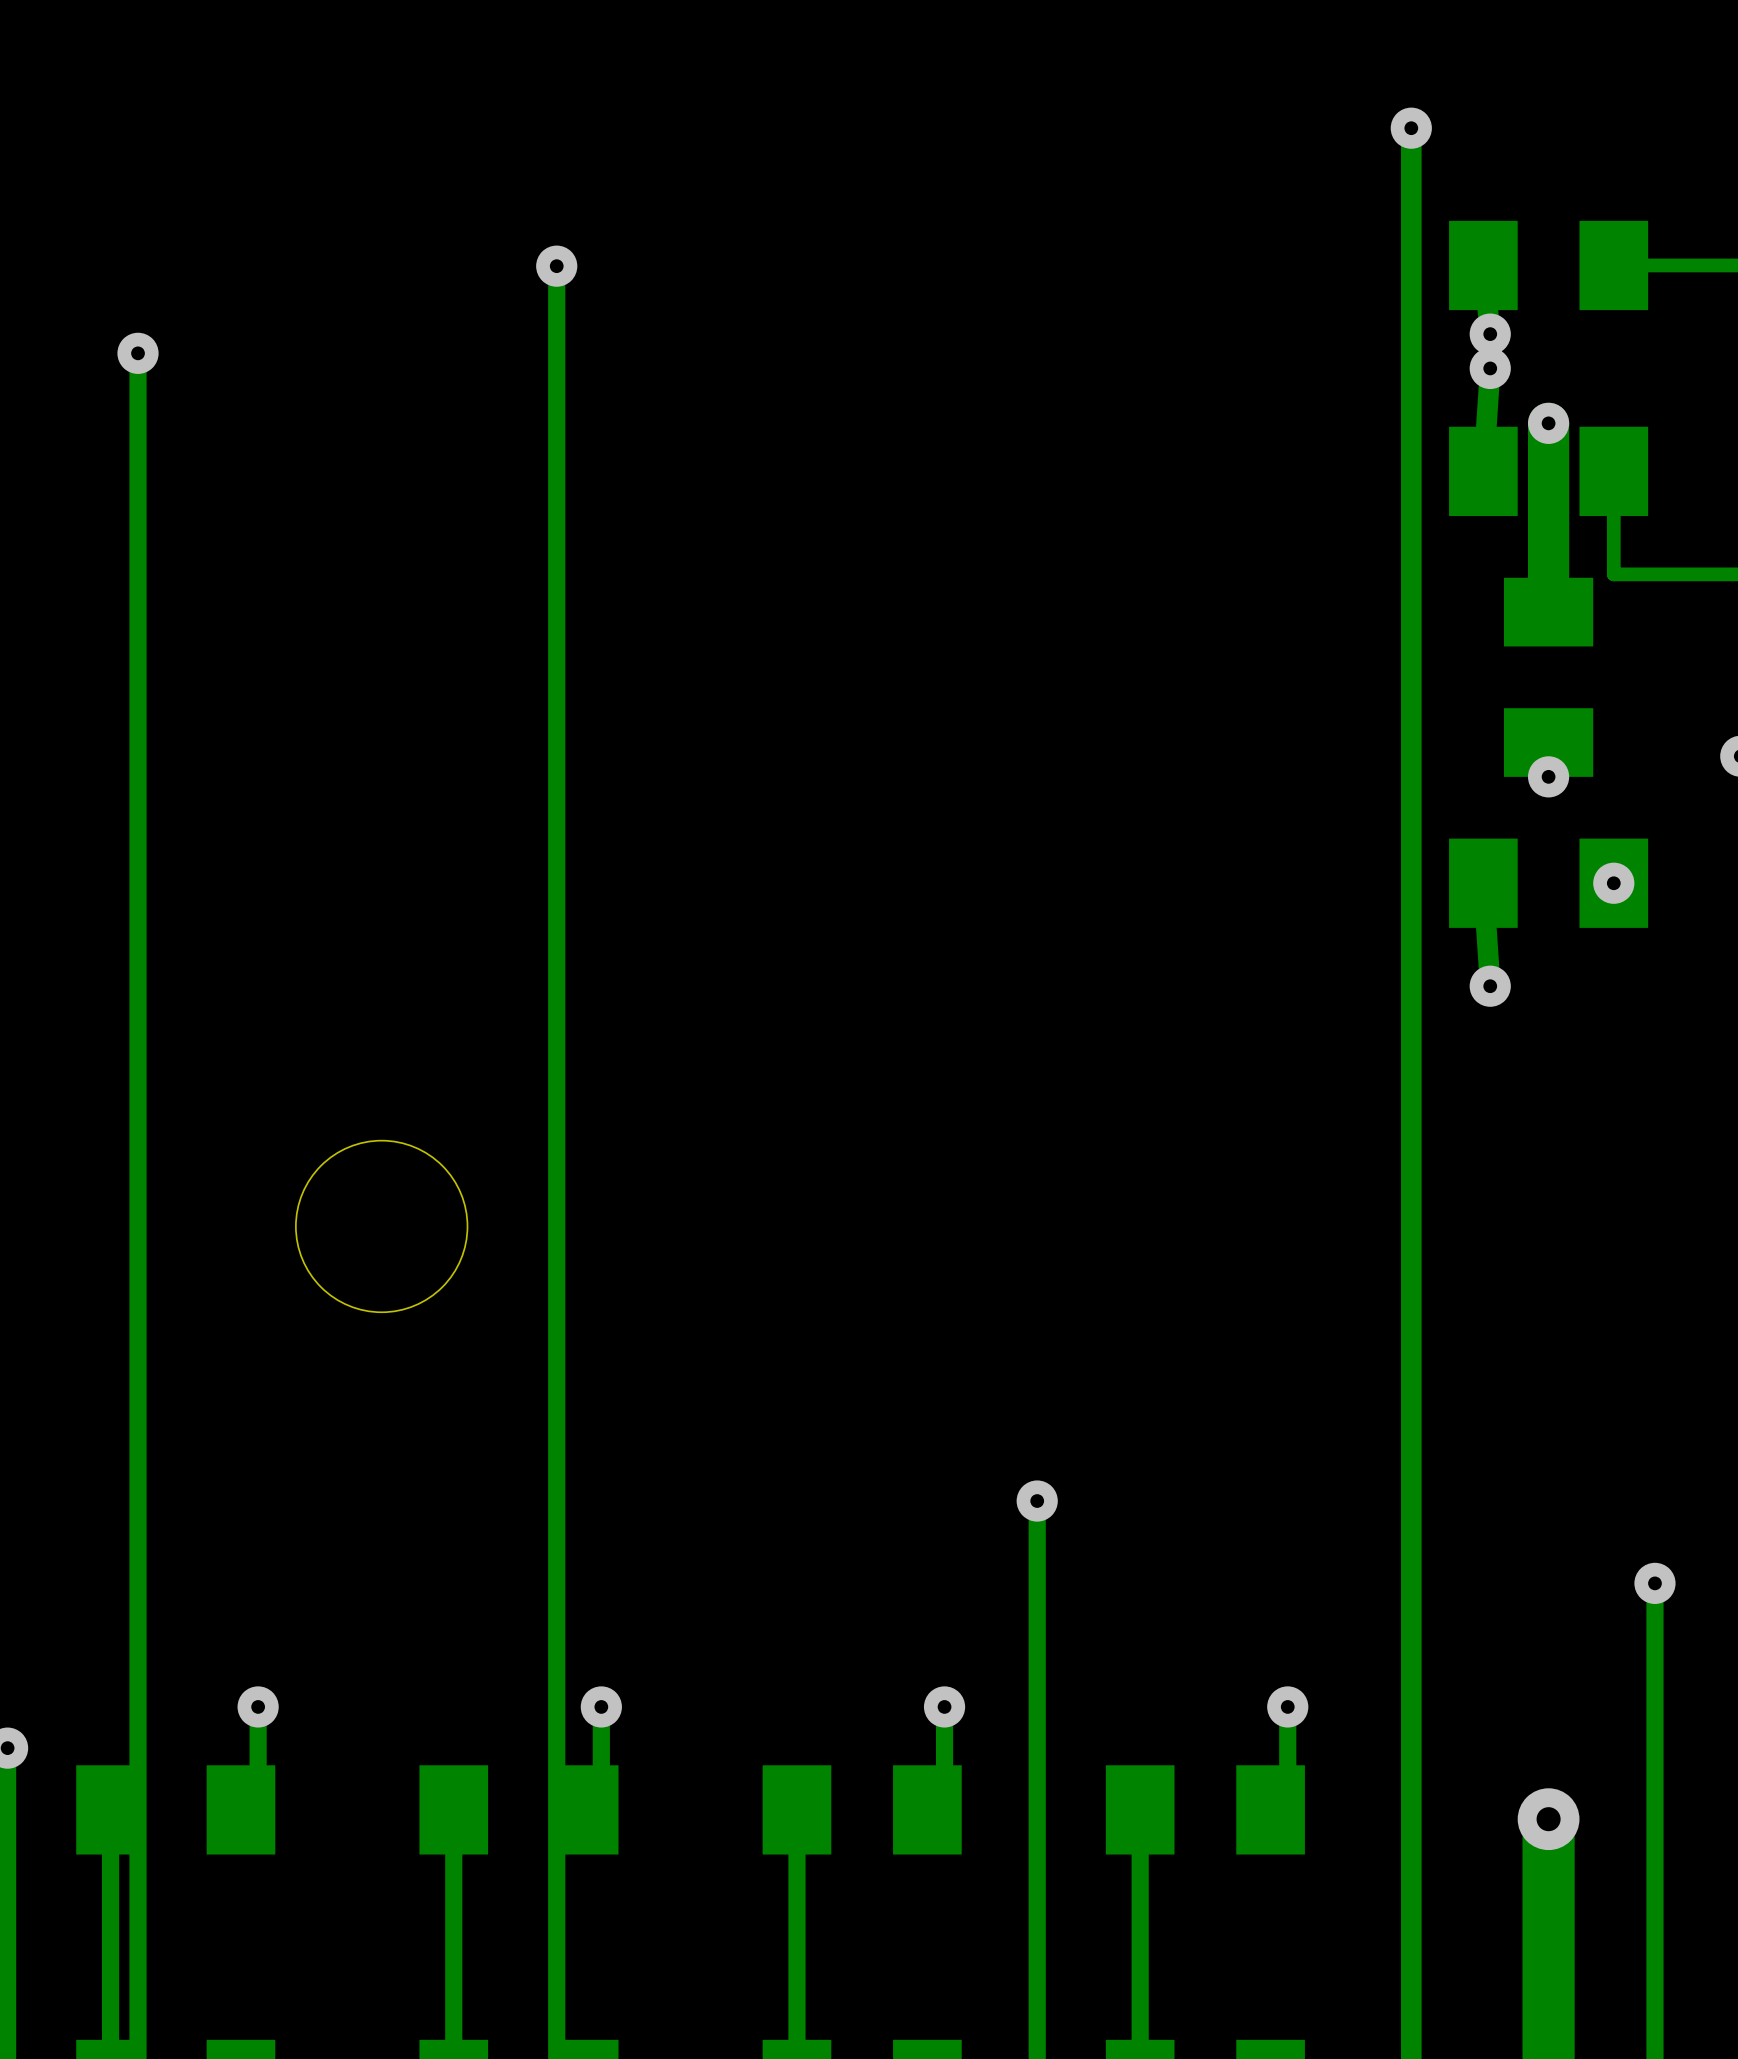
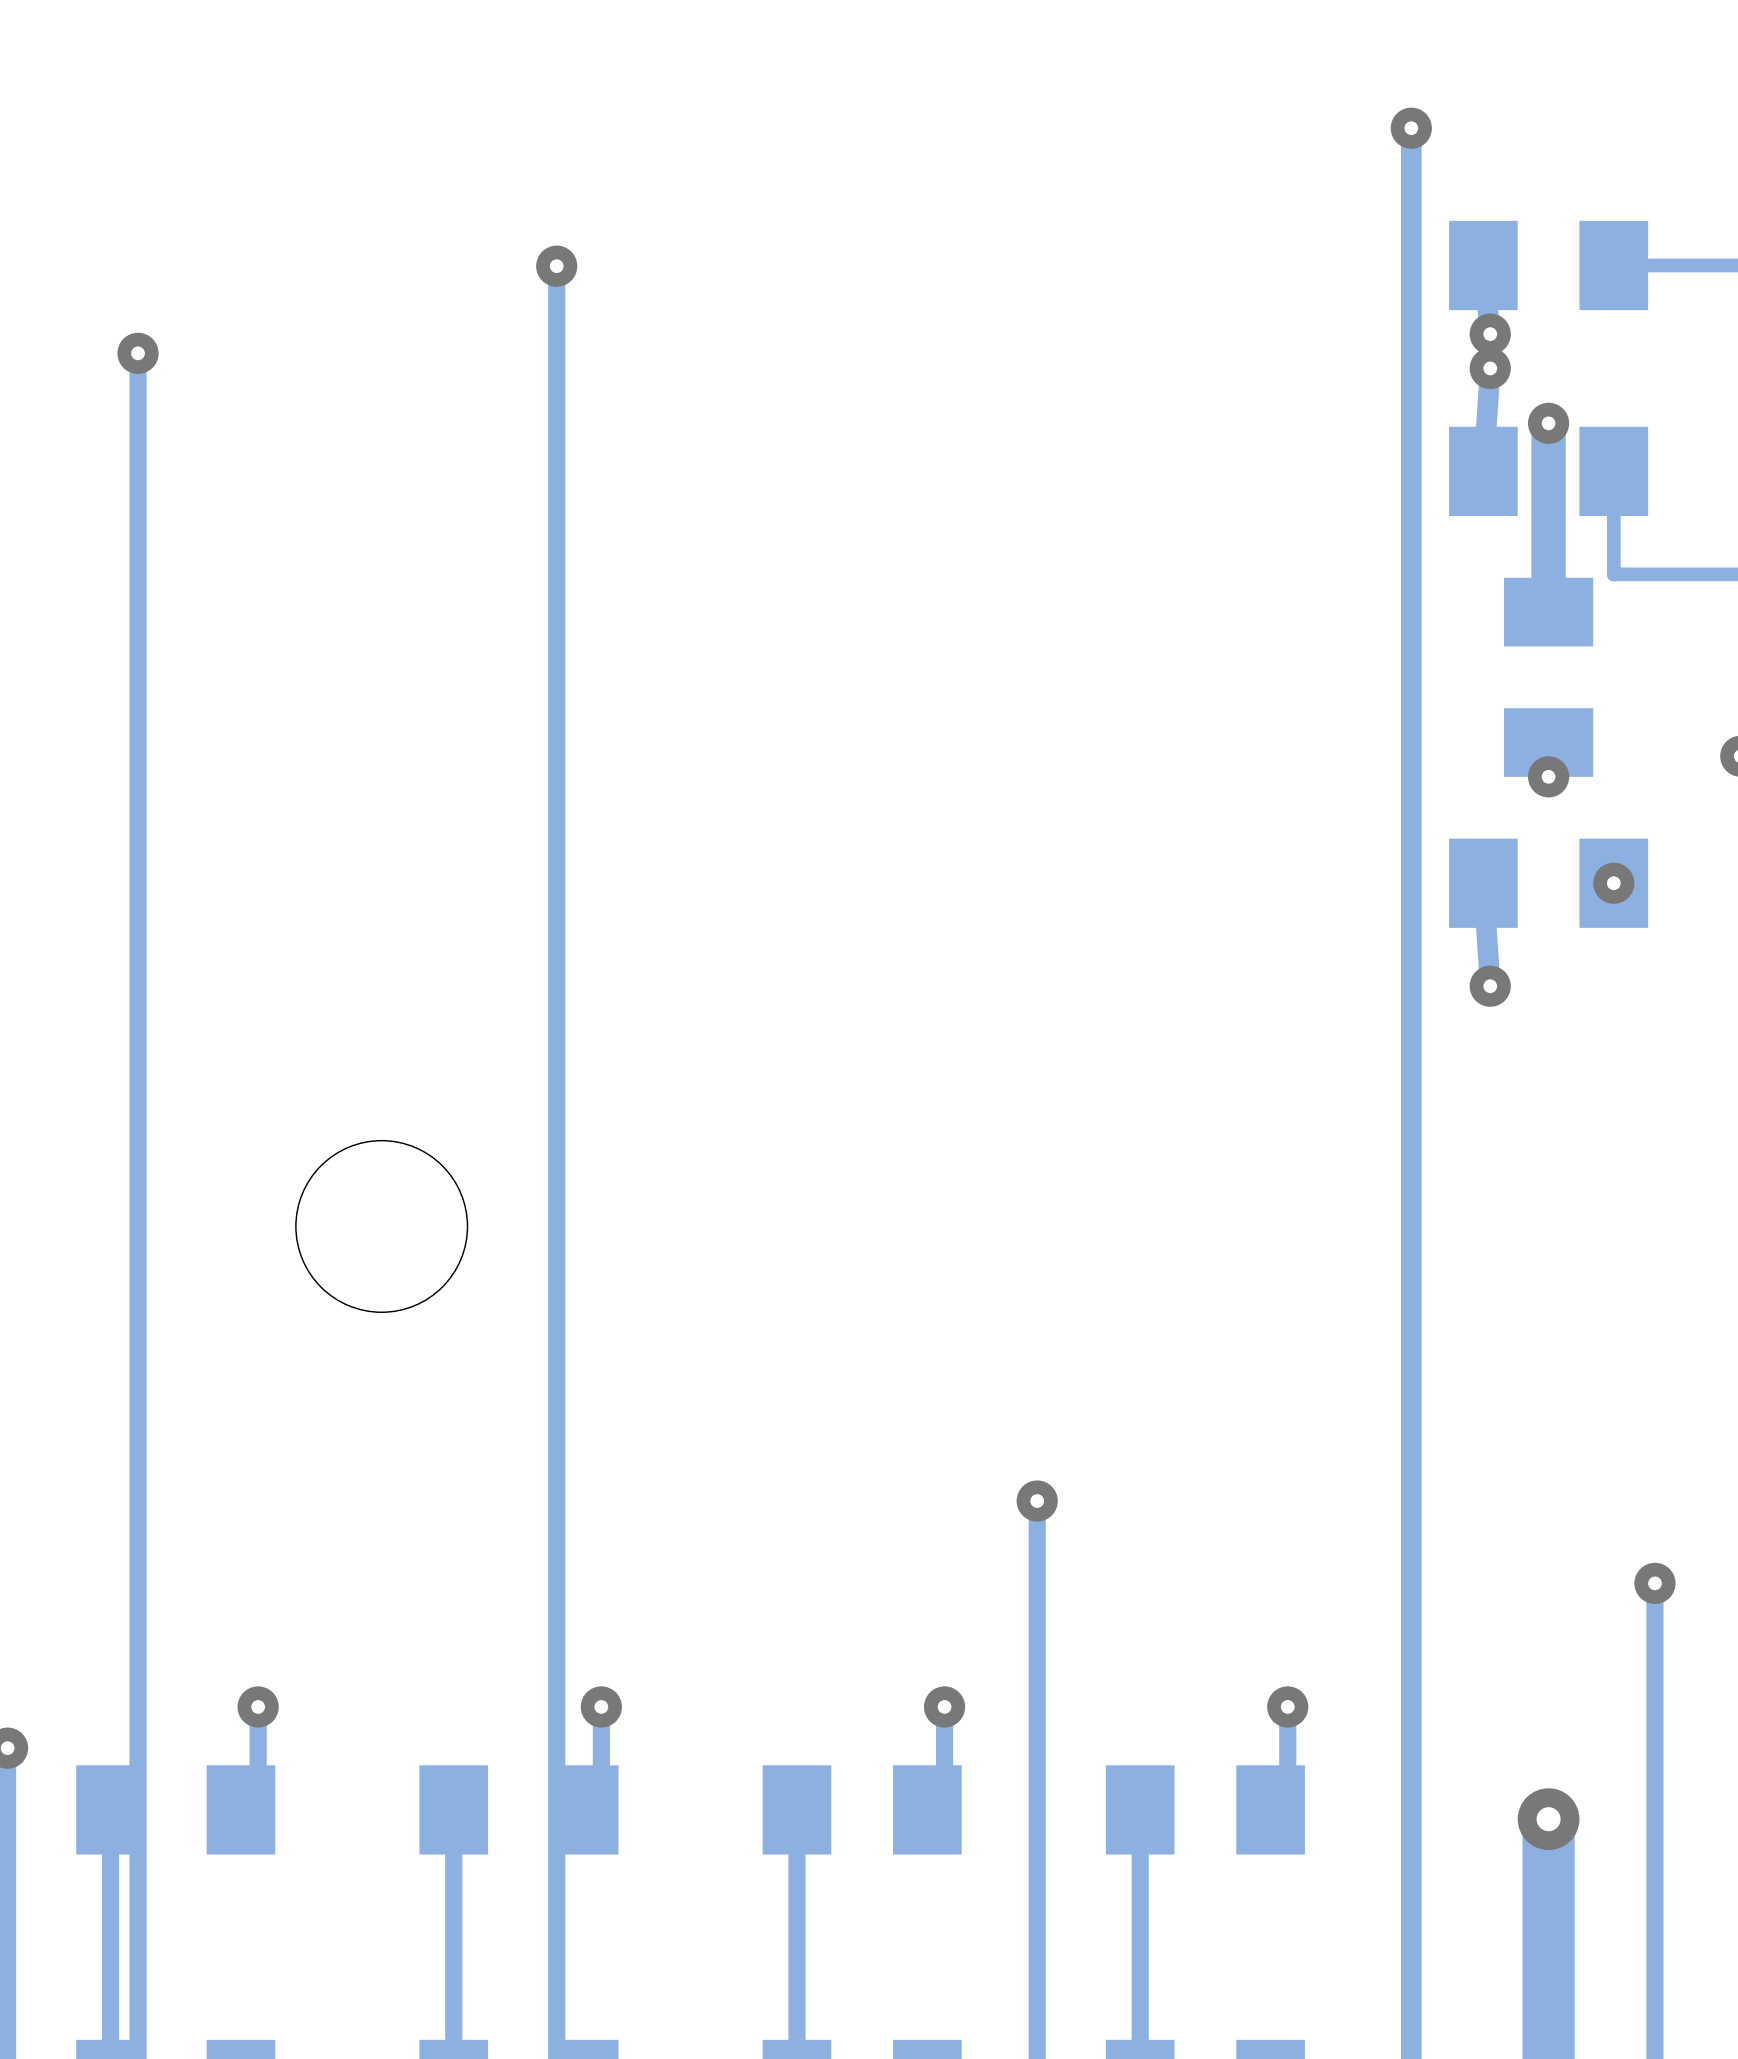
track width: thick (1548, 423) (1548, 612) -> thin (1548, 423) (1548, 612)

